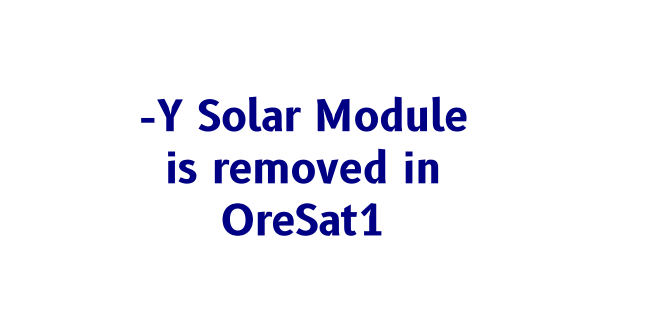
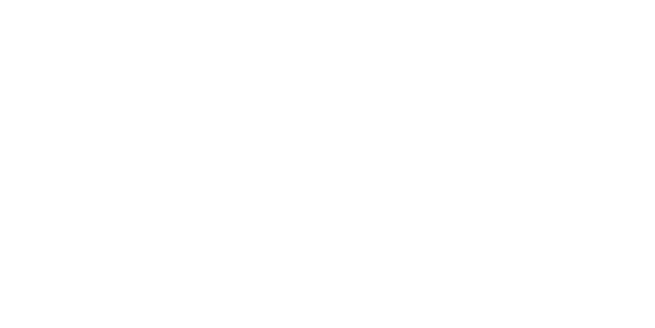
text: -Y Solar Module (303, 114) -> none
text: is removed in (303, 166) -> none
text: OreSat1 (301, 219) -> none

